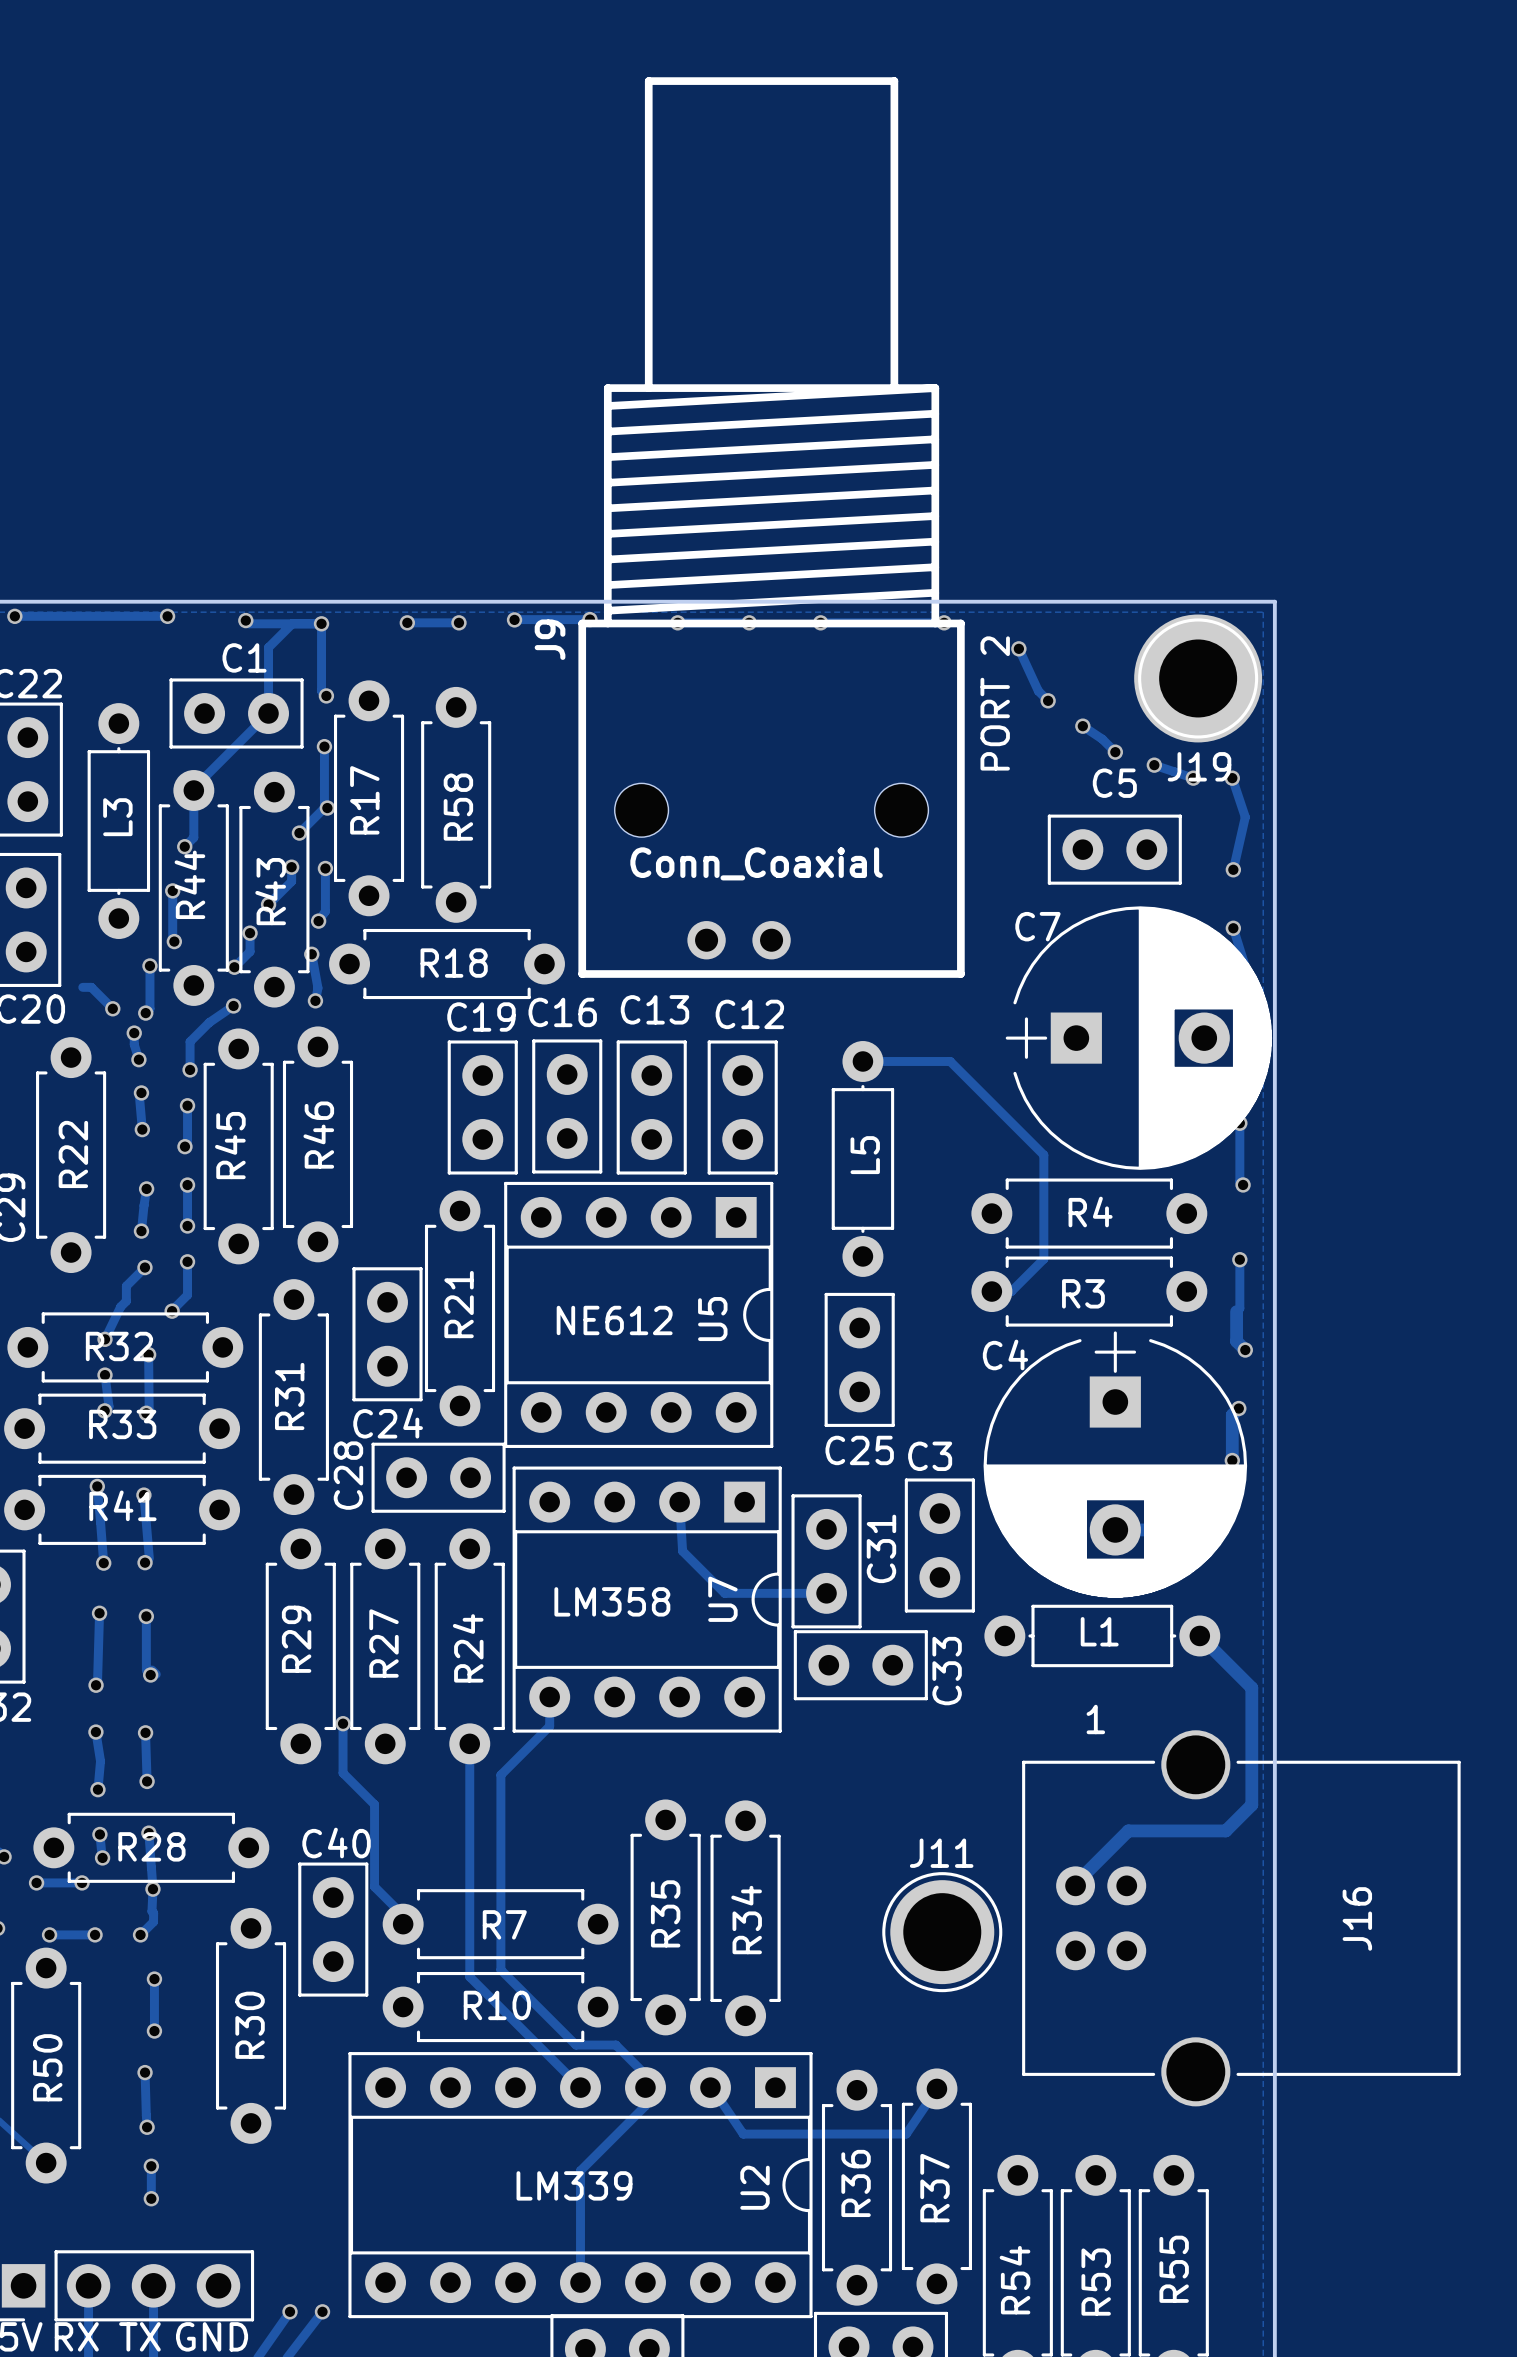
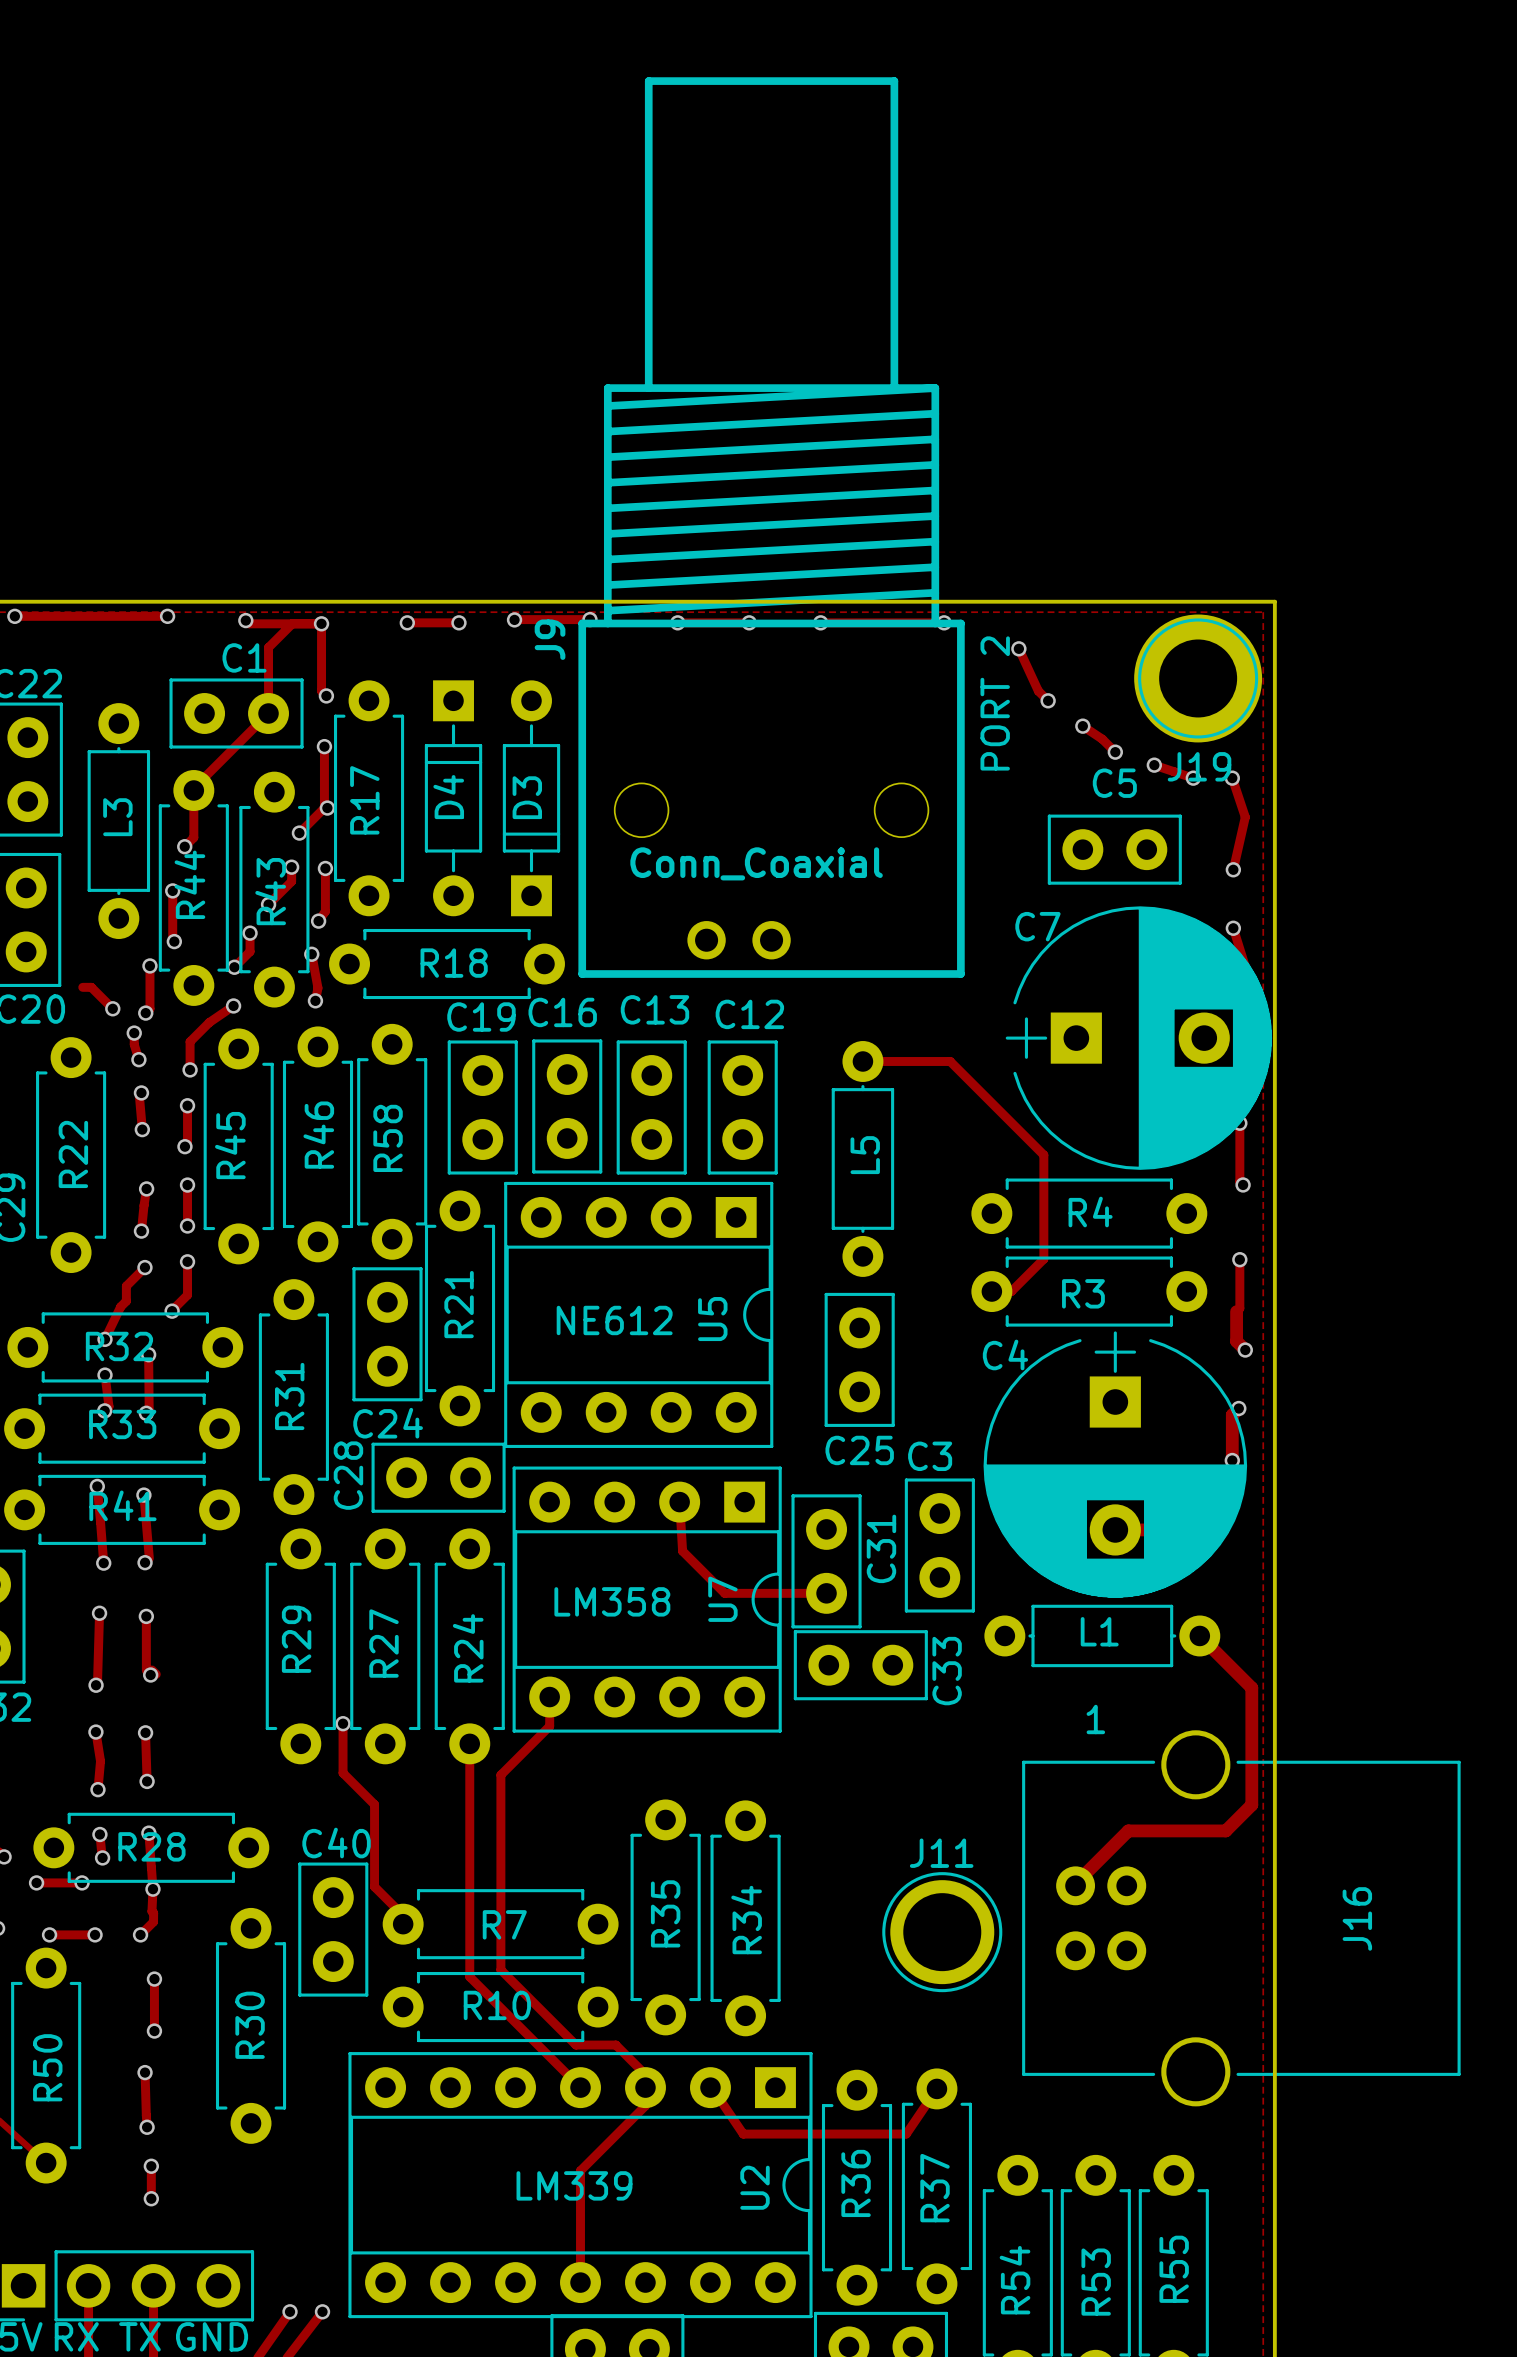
D4: none -> (453, 798)
D3: none -> (531, 798)
R58 position: (456, 804) -> (392, 1141)
R58 name position: R58 (458, 807) -> R58 (388, 1138)

